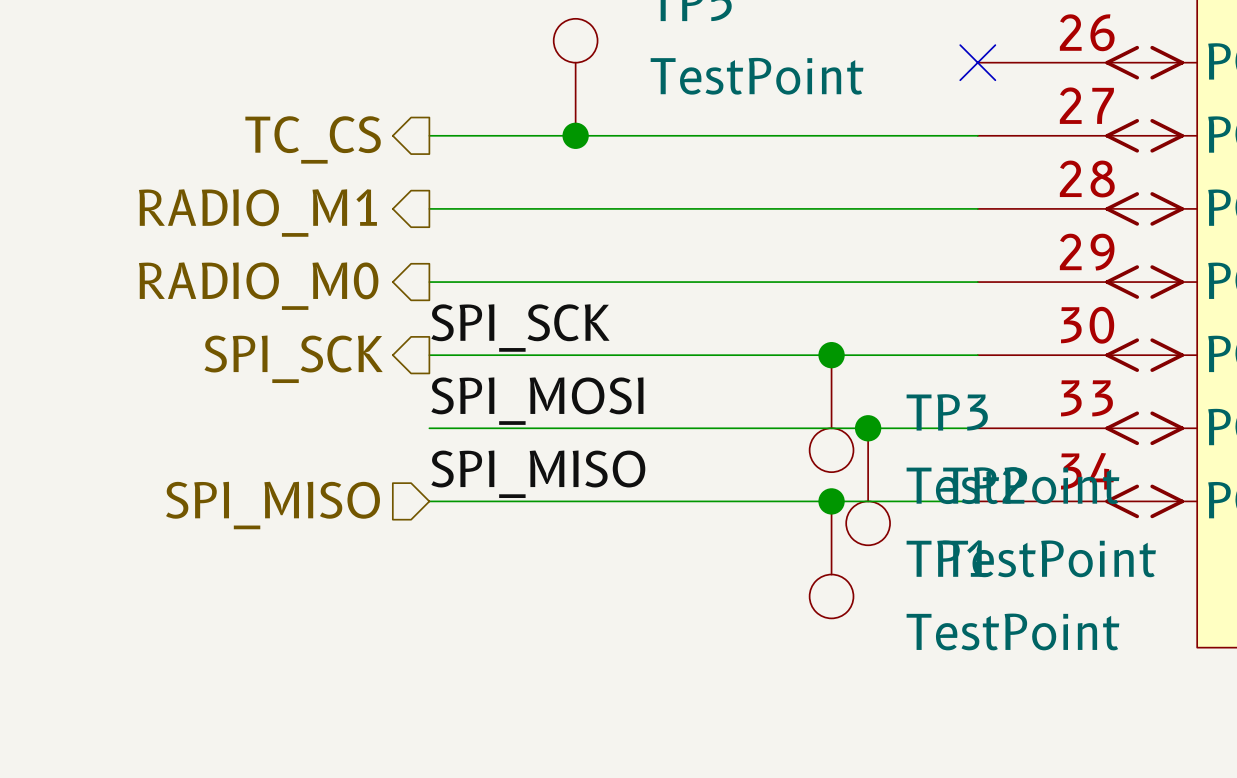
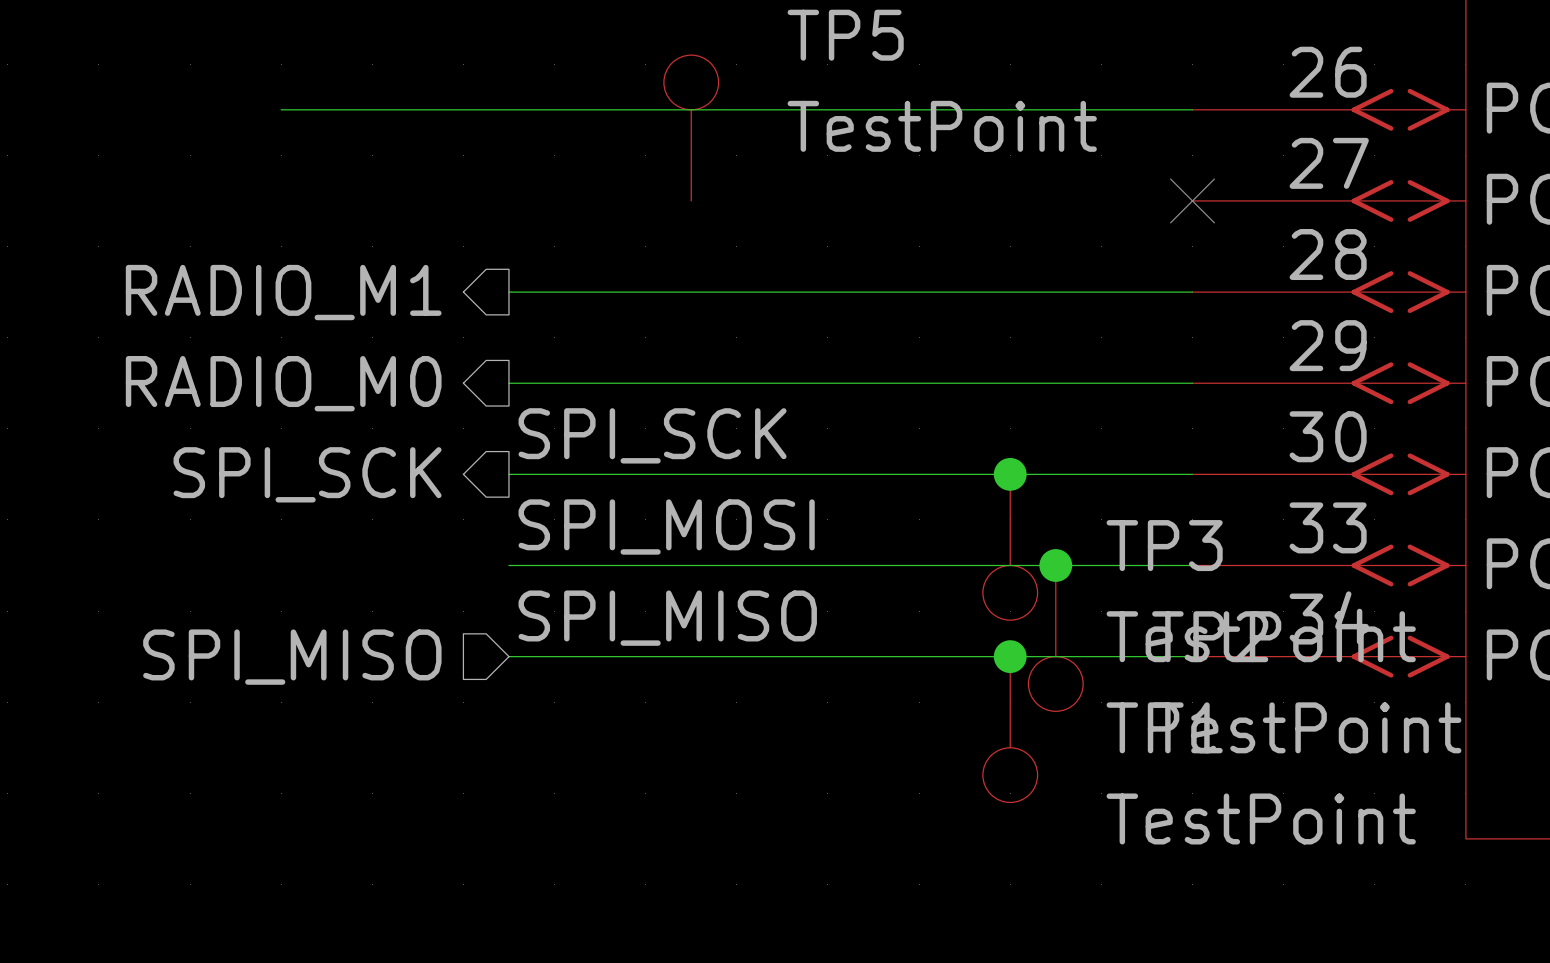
wire: none -> (281, 109) (1192, 109)
no-connect mark: (977, 62) -> none
wire: (429, 135) (977, 135) -> none
junction: (575, 135) -> none
no-connect mark: none -> (1192, 200)
hierarchical label: TC_CS (313, 139) -> none

